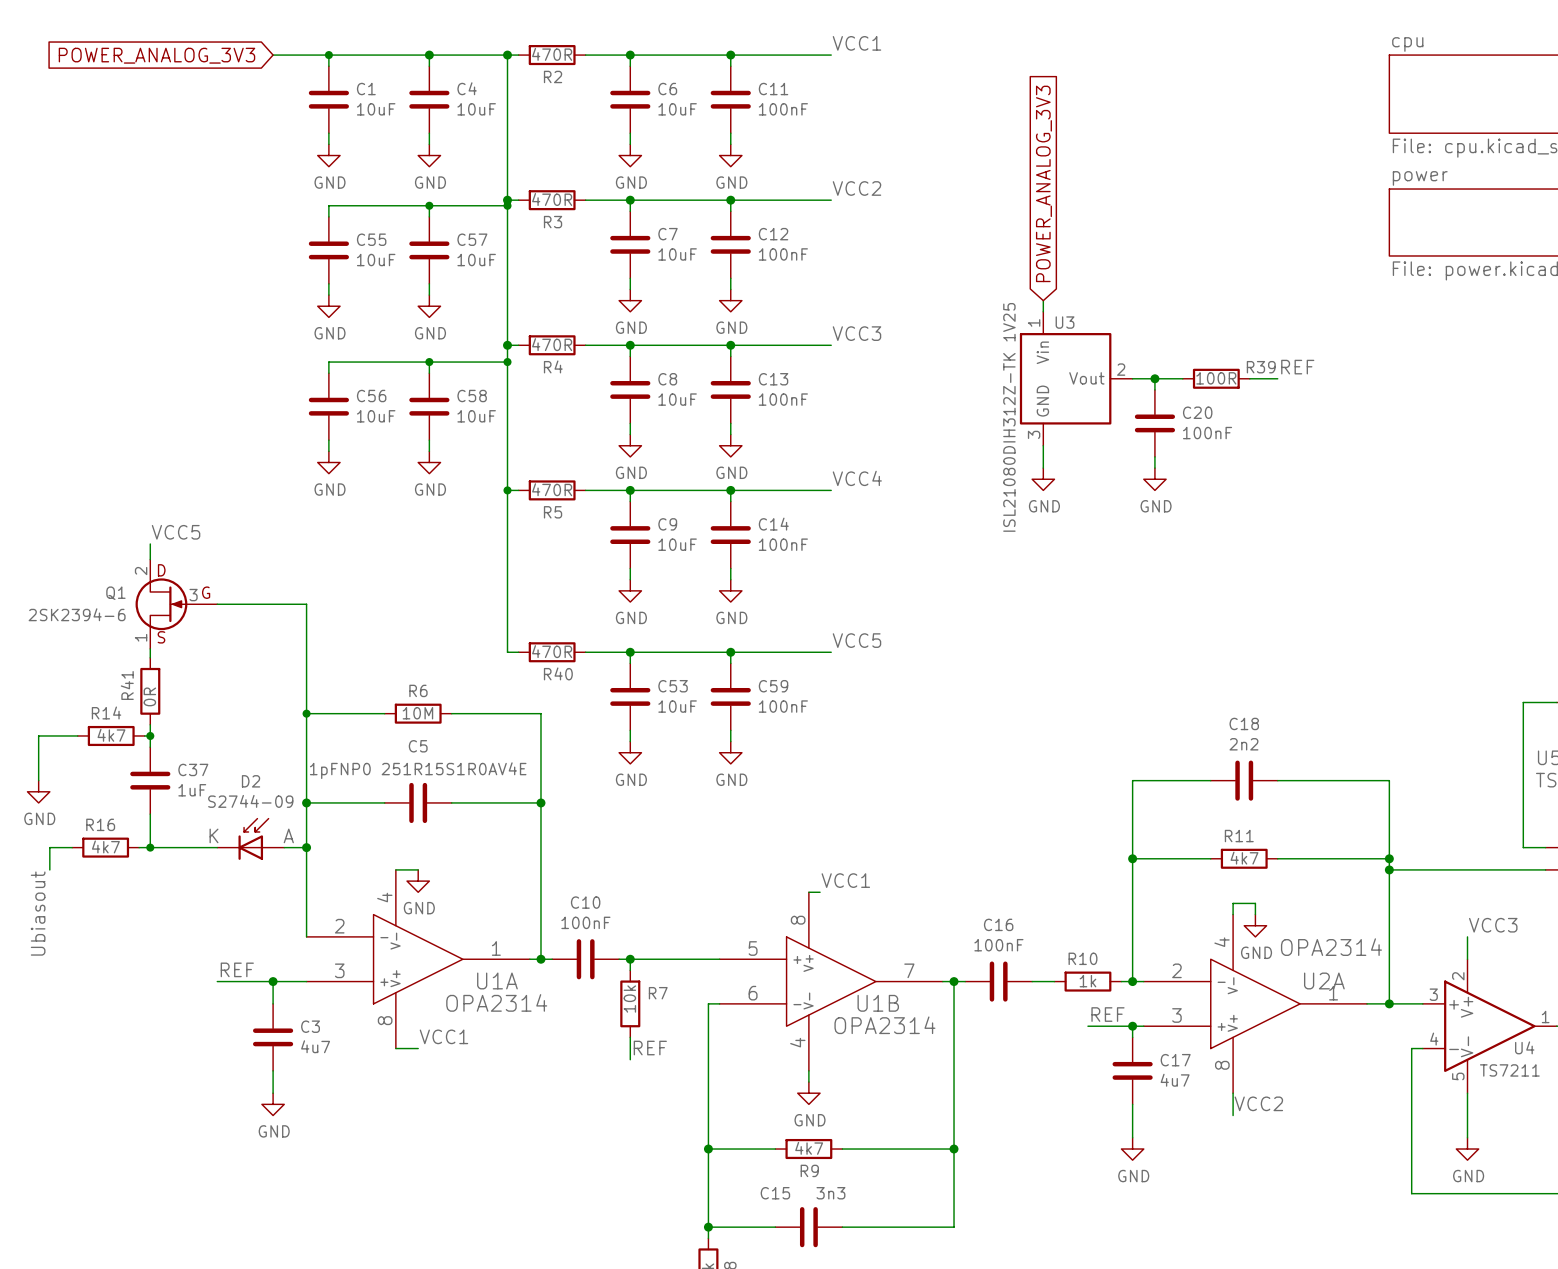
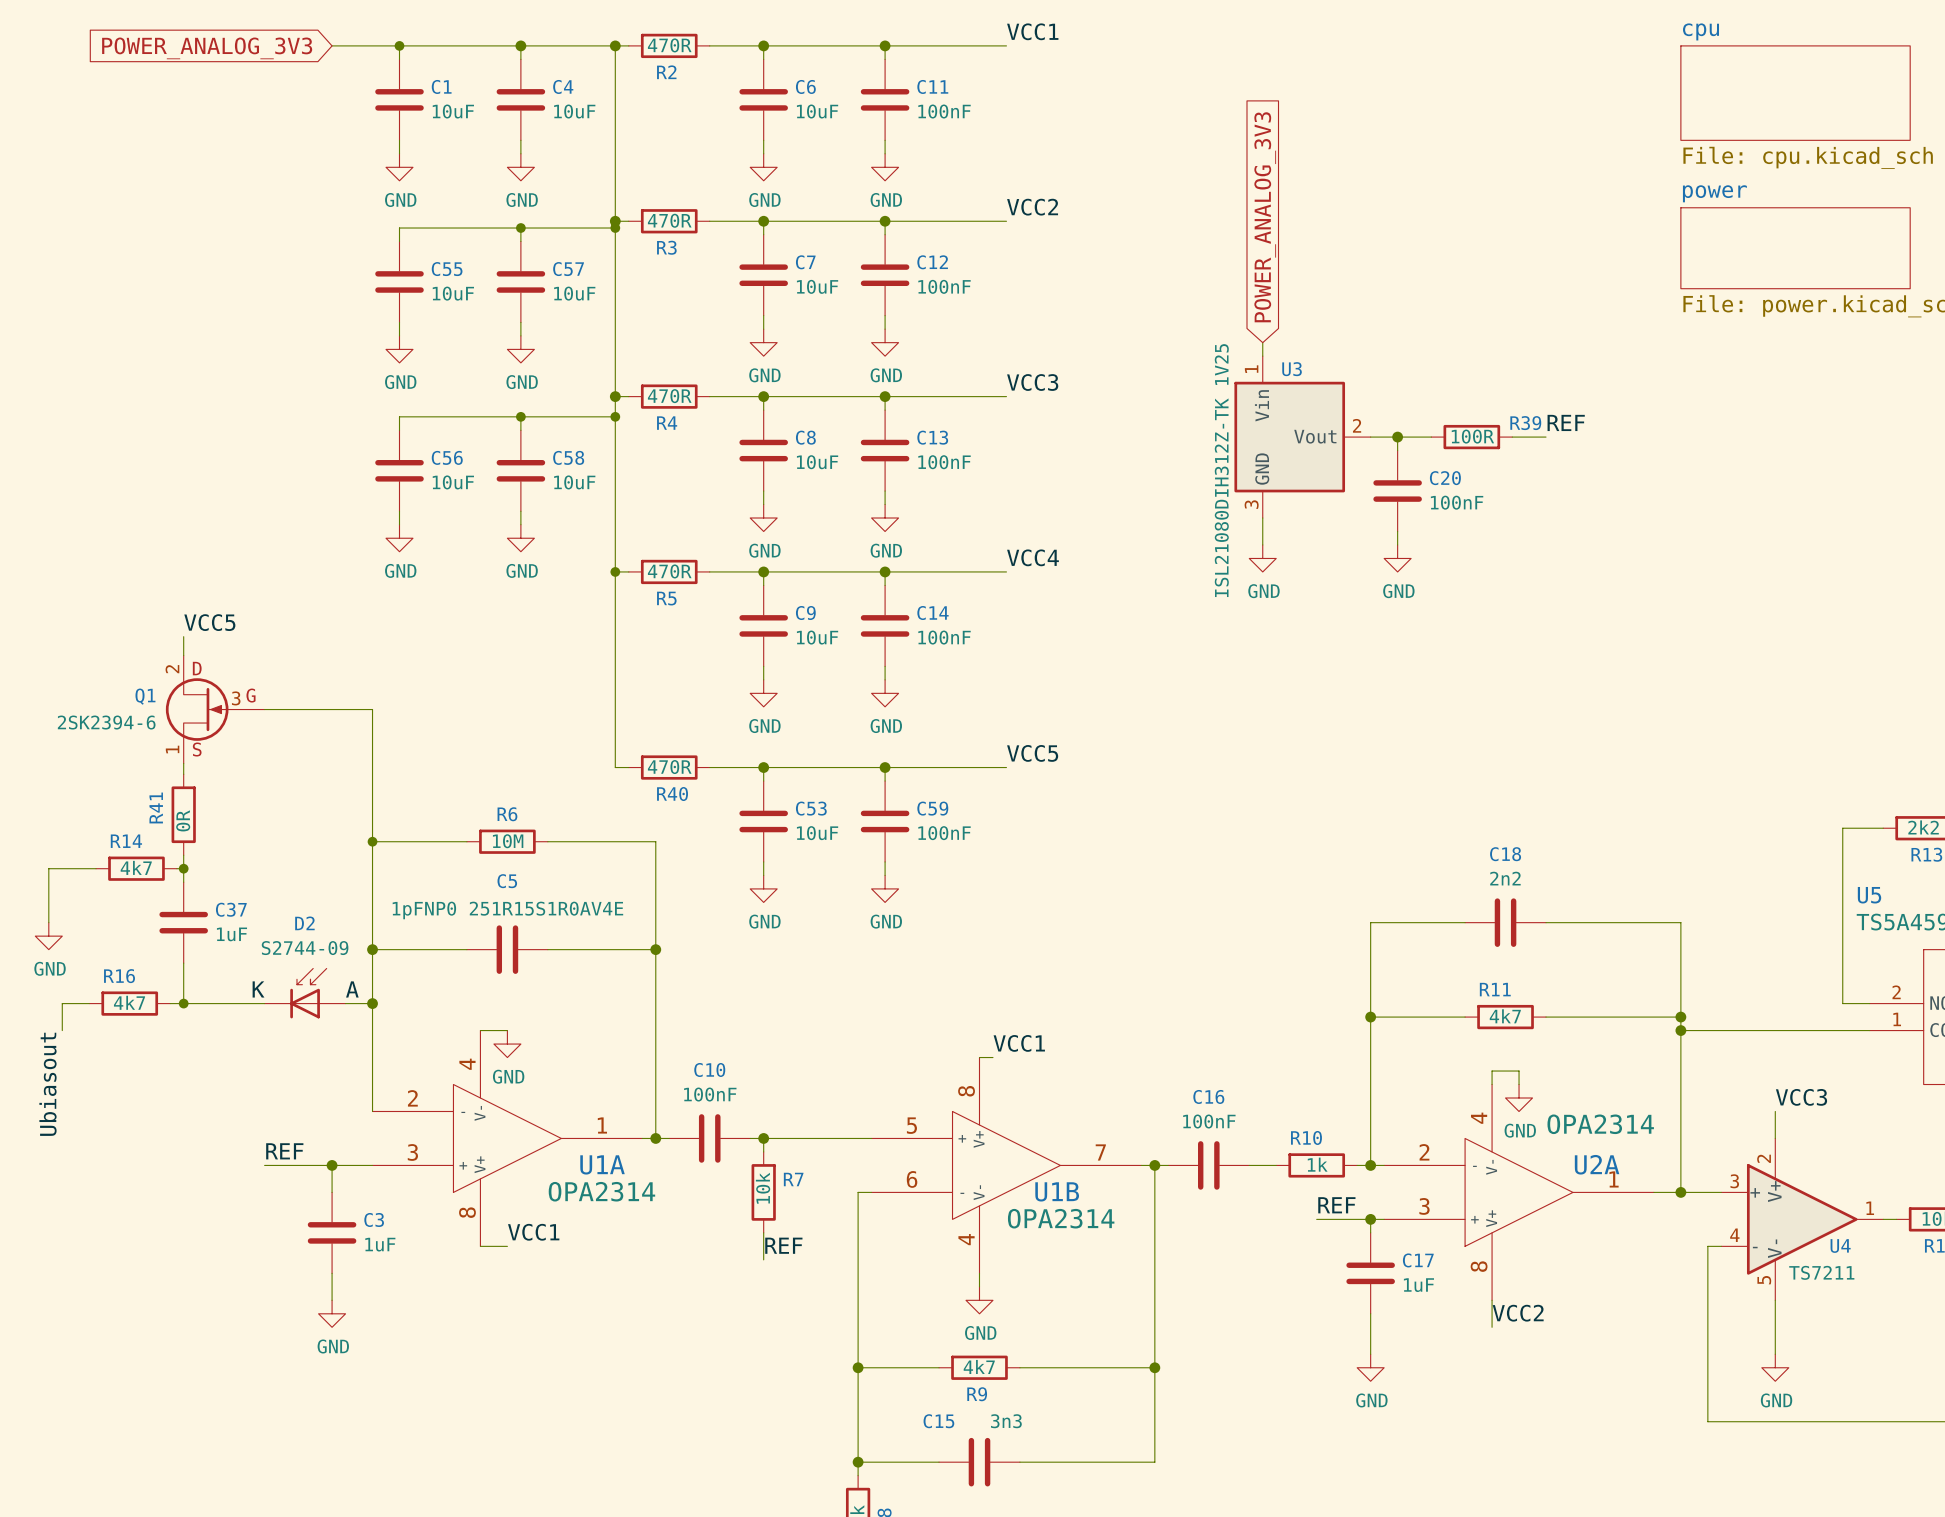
C3 value: 4u7 (315, 1046) -> 1uF (380, 1244)
C17 value: 4u7 (1175, 1080) -> 1uF (1418, 1285)

